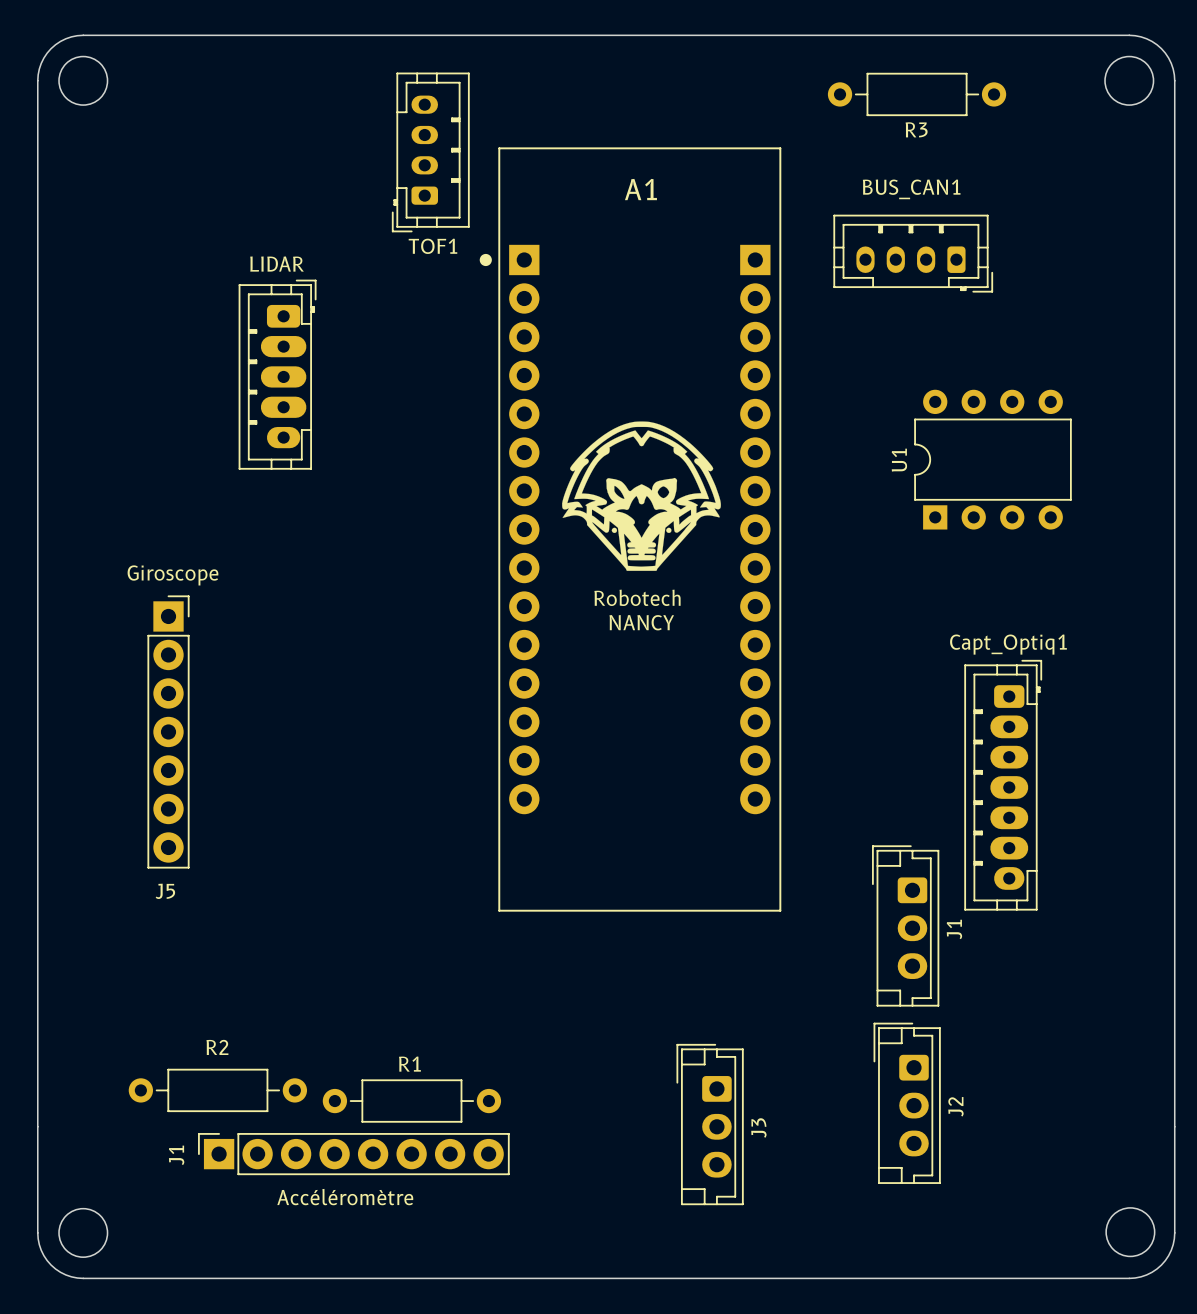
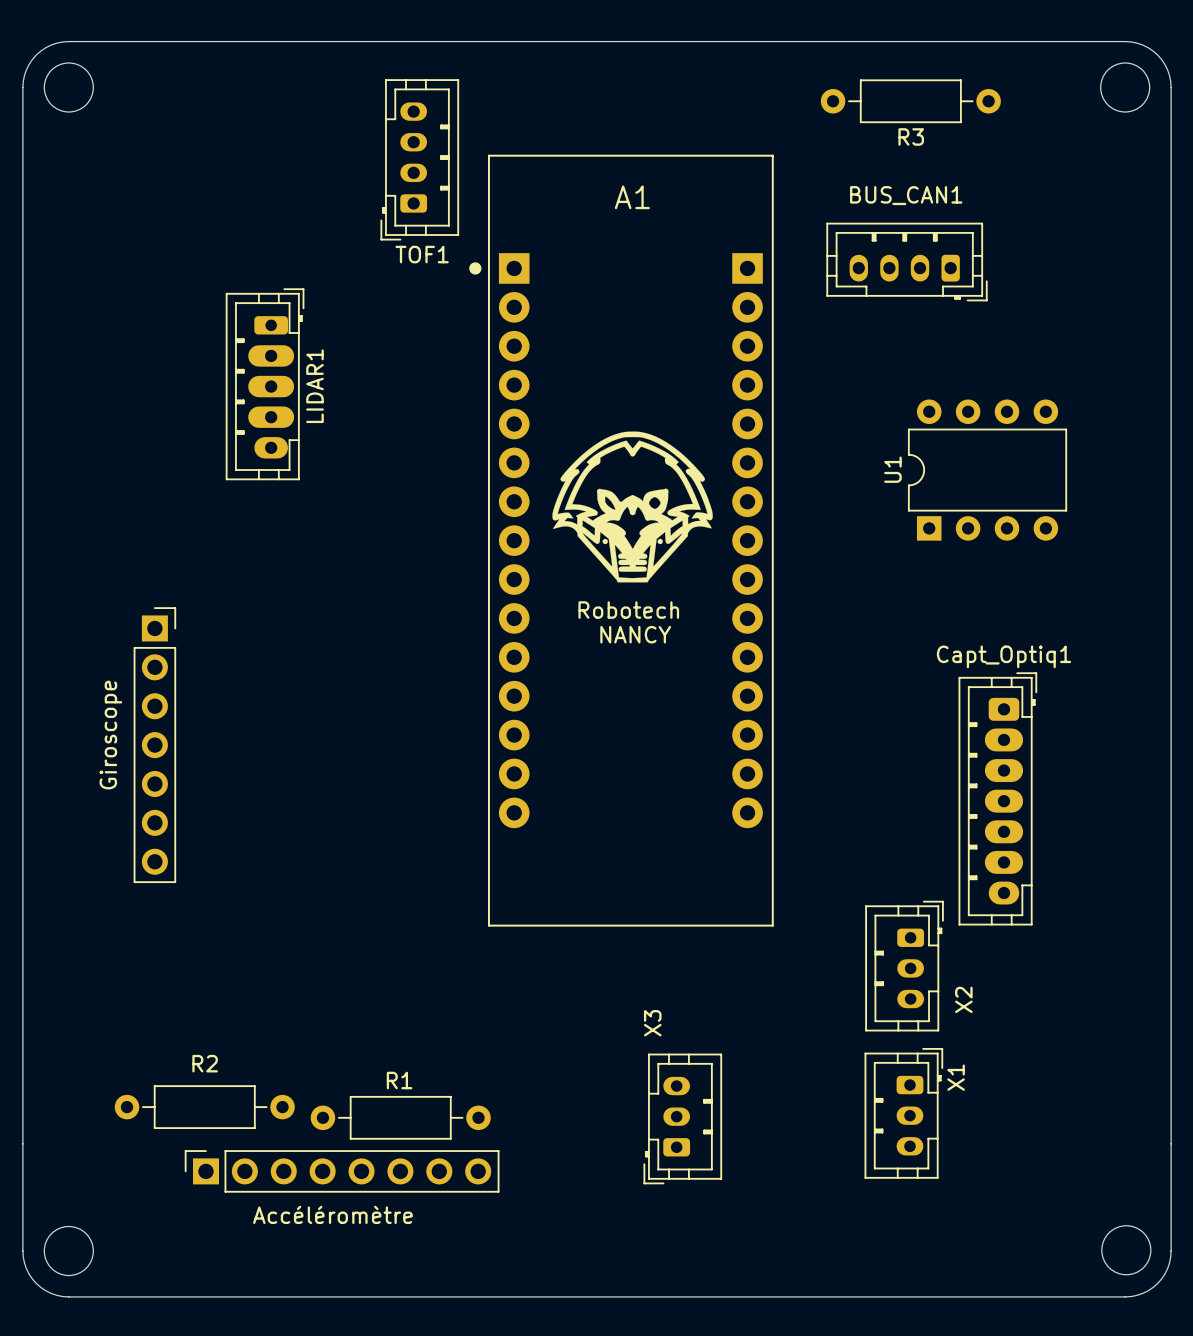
LIDAR: (277, 374) -> none
LIDAR1: none -> (265, 384)
text rotation: 0° (172, 575) -> 90° counterclockwise (110, 735)
text position: Giroscope (172, 575) -> Giroscope (110, 735)
J5: (168, 731) -> none
part: none -> (154, 745)
J1: (905, 925) -> none
part: none -> (904, 966)
text: none -> X2 (963, 999)
text: none -> X3 (652, 1023)
text: none -> X1 (956, 1077)
part: none -> (903, 1113)
part: none -> (682, 1118)
J2: (907, 1103) -> none
J3: (710, 1124) -> none
J1: (353, 1154) -> none
part: none -> (342, 1171)

